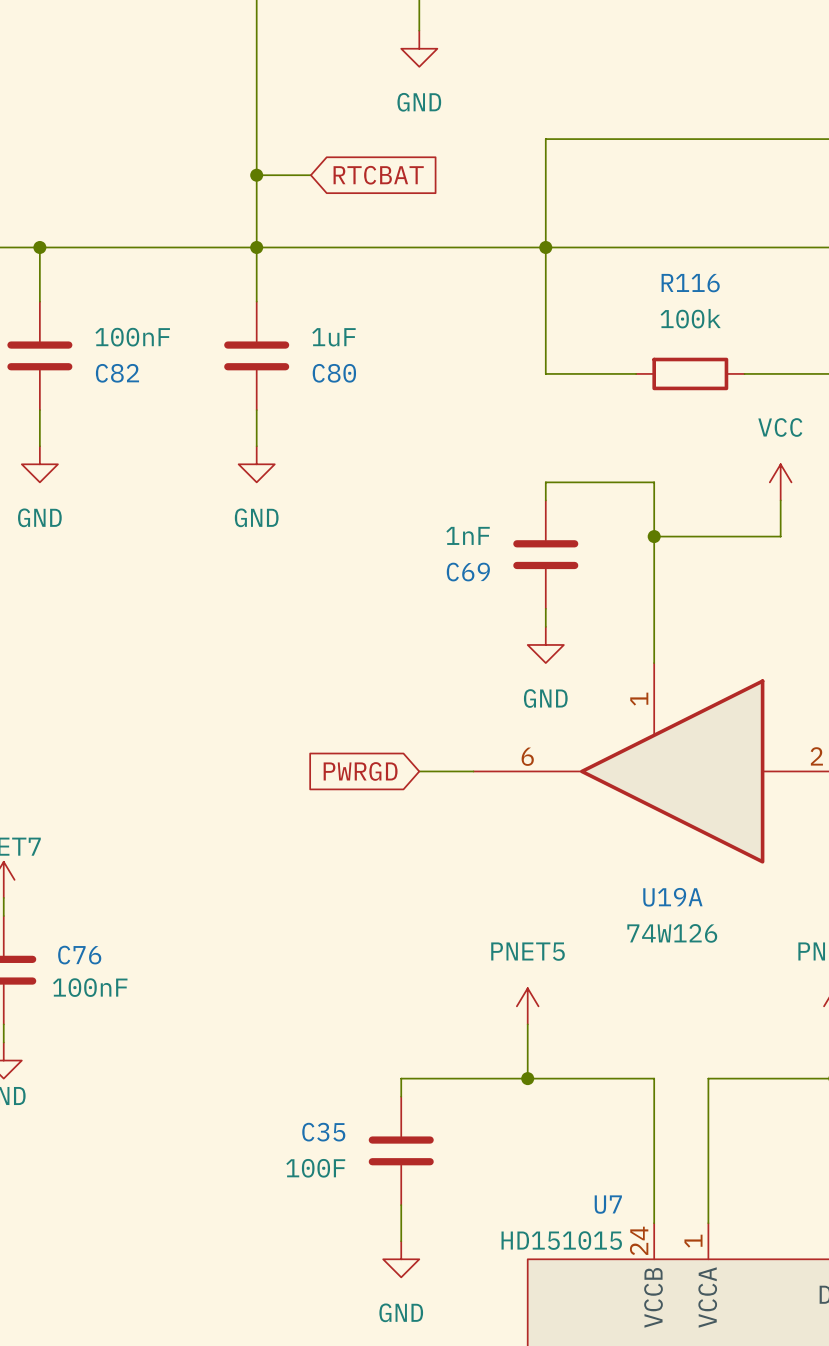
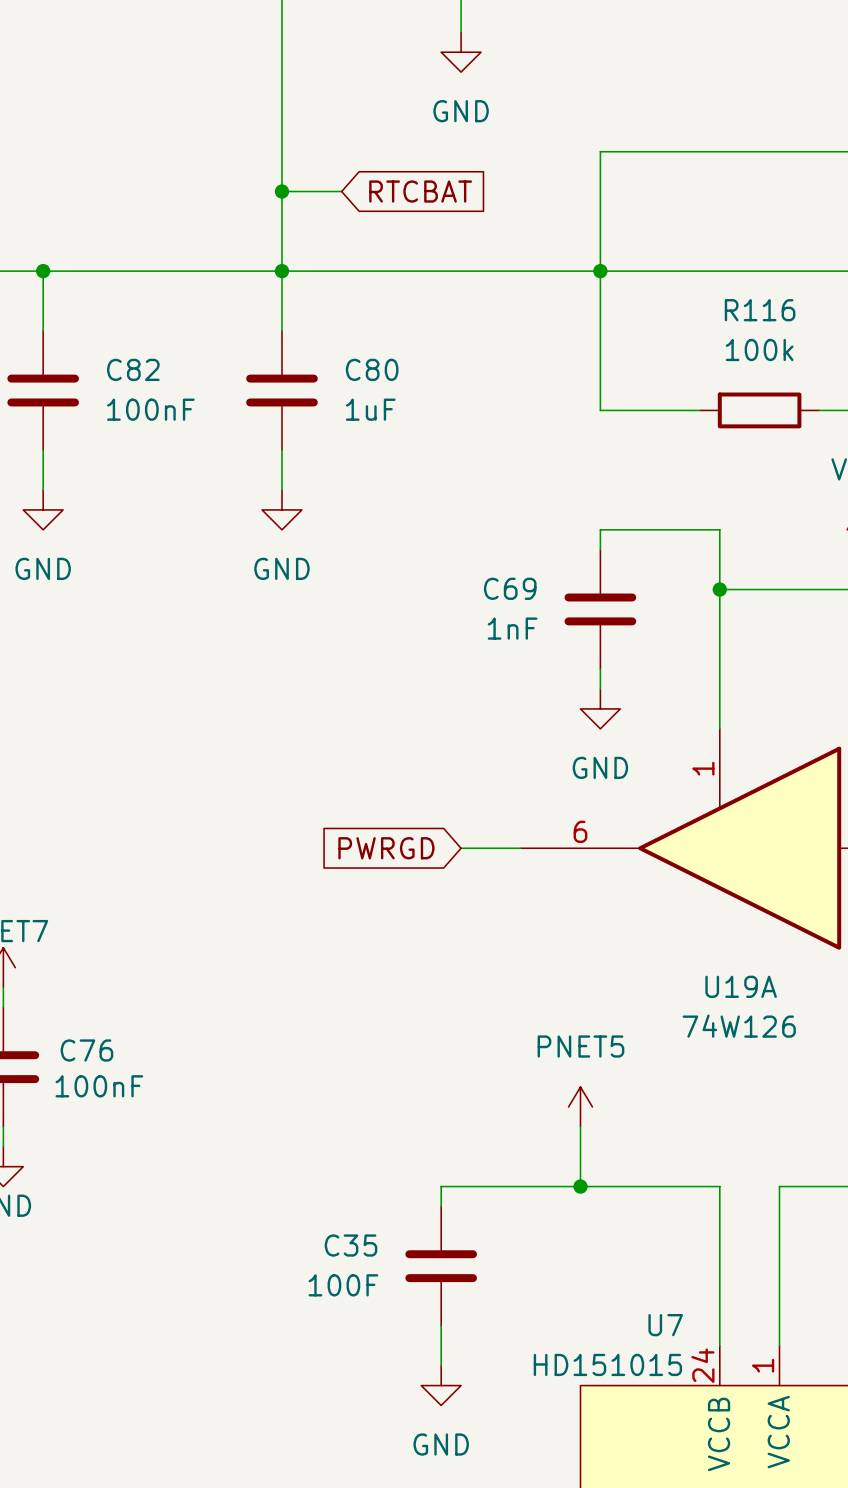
C82 value position: 100nF (132, 337) -> 100nF (150, 409)
C80 value position: 1uF (333, 337) -> 1uF (370, 409)
C82 name position: C82 (117, 373) -> C82 (133, 369)
C80 name position: C80 (334, 373) -> C80 (372, 369)
C69 value position: 1nF (468, 535) -> 1nF (512, 628)
C69 name position: C69 (468, 572) -> C69 (510, 588)

